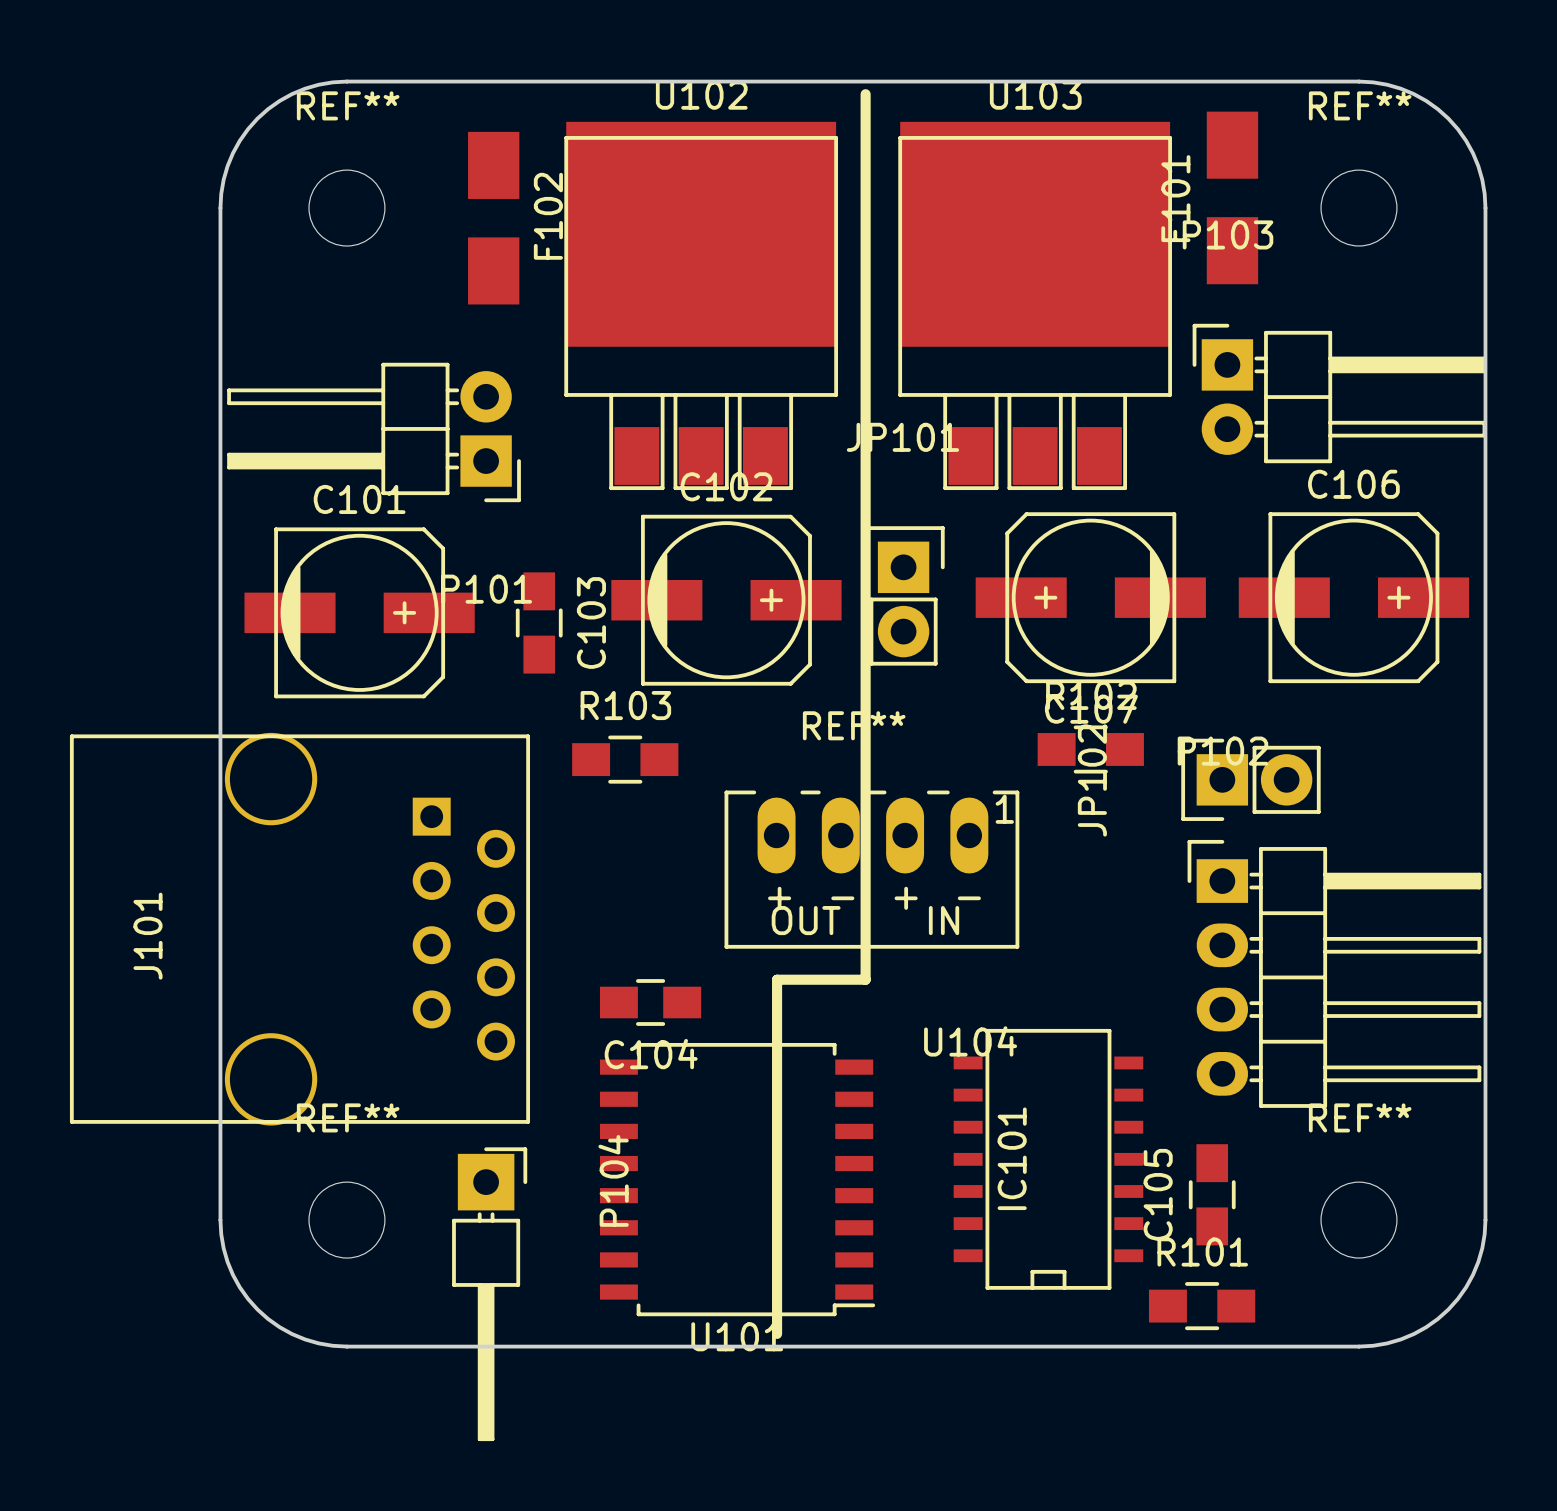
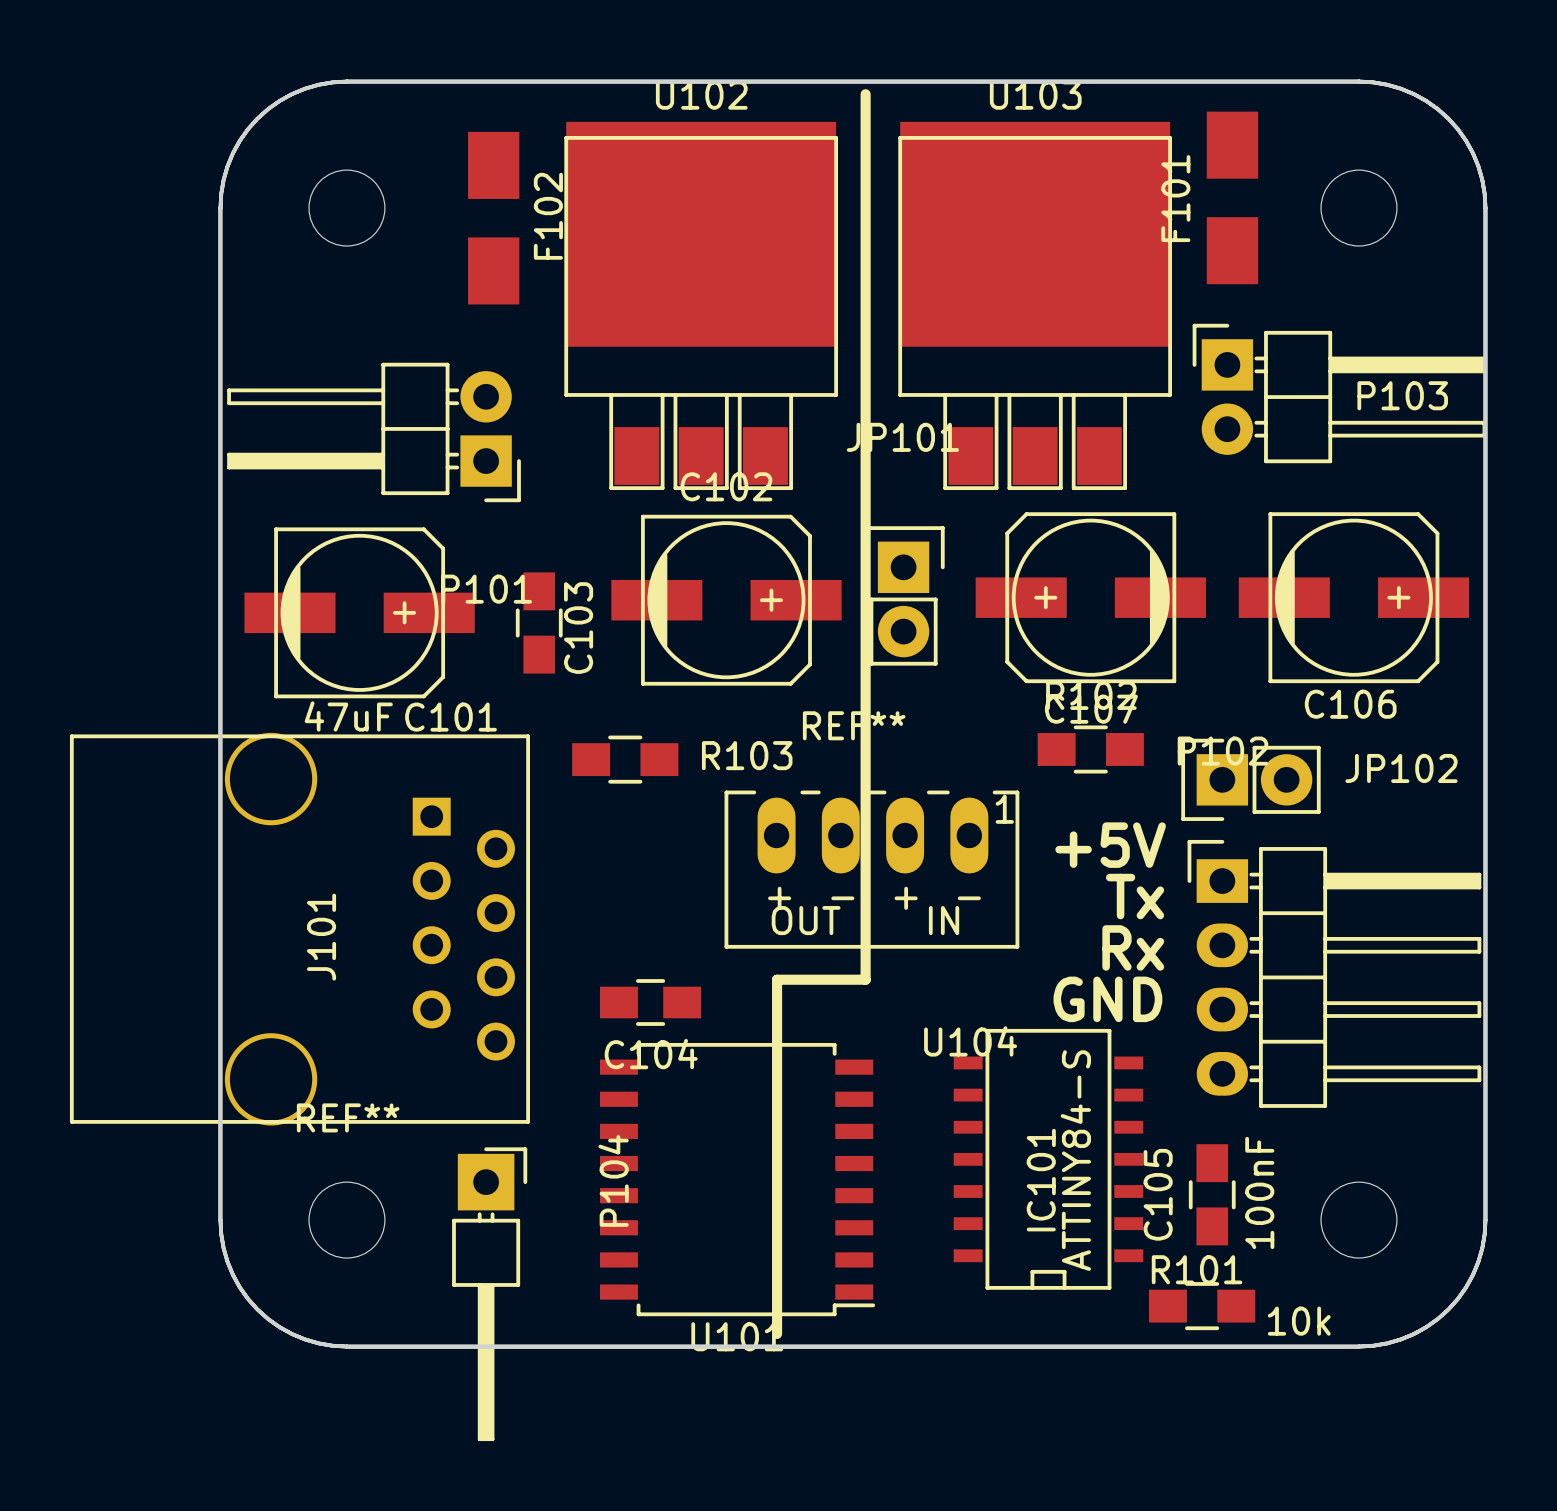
drawing: none -> [218, 79, 1488, 1349]
REF** name: REF** (348, 105) -> none
REF** name: REF** (1360, 105) -> none
P103 name position: P103 (1228, 234) -> P103 (1402, 395)
C106 name position: C106 (1353, 484) -> C106 (1350, 704)
C101 name position: C101 (359, 499) -> C101 (450, 717)
C103 name position: C103 (591, 622) -> C103 (578, 628)
R103 name position: R103 (625, 705) -> R103 (747, 755)
C101 value: none -> 47uF (348, 716)
JP102 name rotation: 0° (1092, 780) -> 90° clockwise (1401, 768)
JP102 name position: JP102 (1092, 780) -> JP102 (1401, 768)
text: none -> +5V (1110, 845)
text: none -> Tx (1135, 896)
J101 name position: J101 (148, 936) -> J101 (321, 937)
text: none -> Rx (1133, 947)
text: none -> GND (1107, 999)
REF** name: REF** (1360, 1117) -> none
IC101 name position: IC101 (1012, 1158) -> IC101 (1041, 1180)
IC101 value: none -> ATTINY84-S (1075, 1160)
C105 value: none -> 100nF (1259, 1192)
R101 name position: R101 (1202, 1252) -> R101 (1197, 1269)
R101 value: none -> 10k (1299, 1321)

